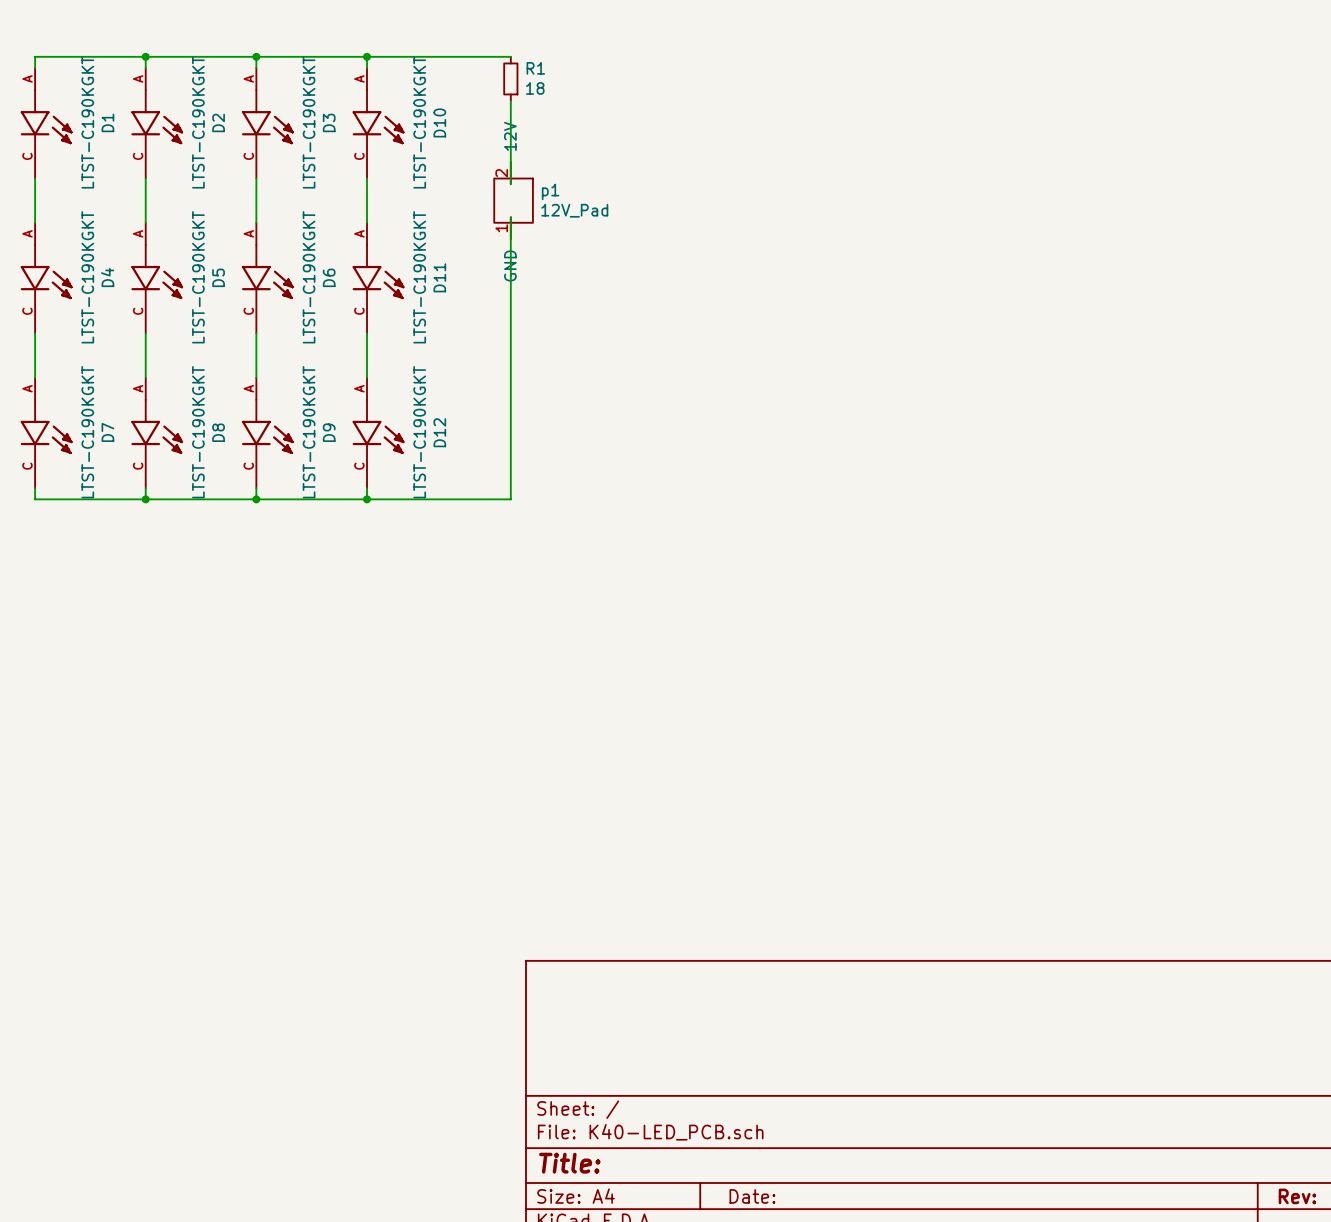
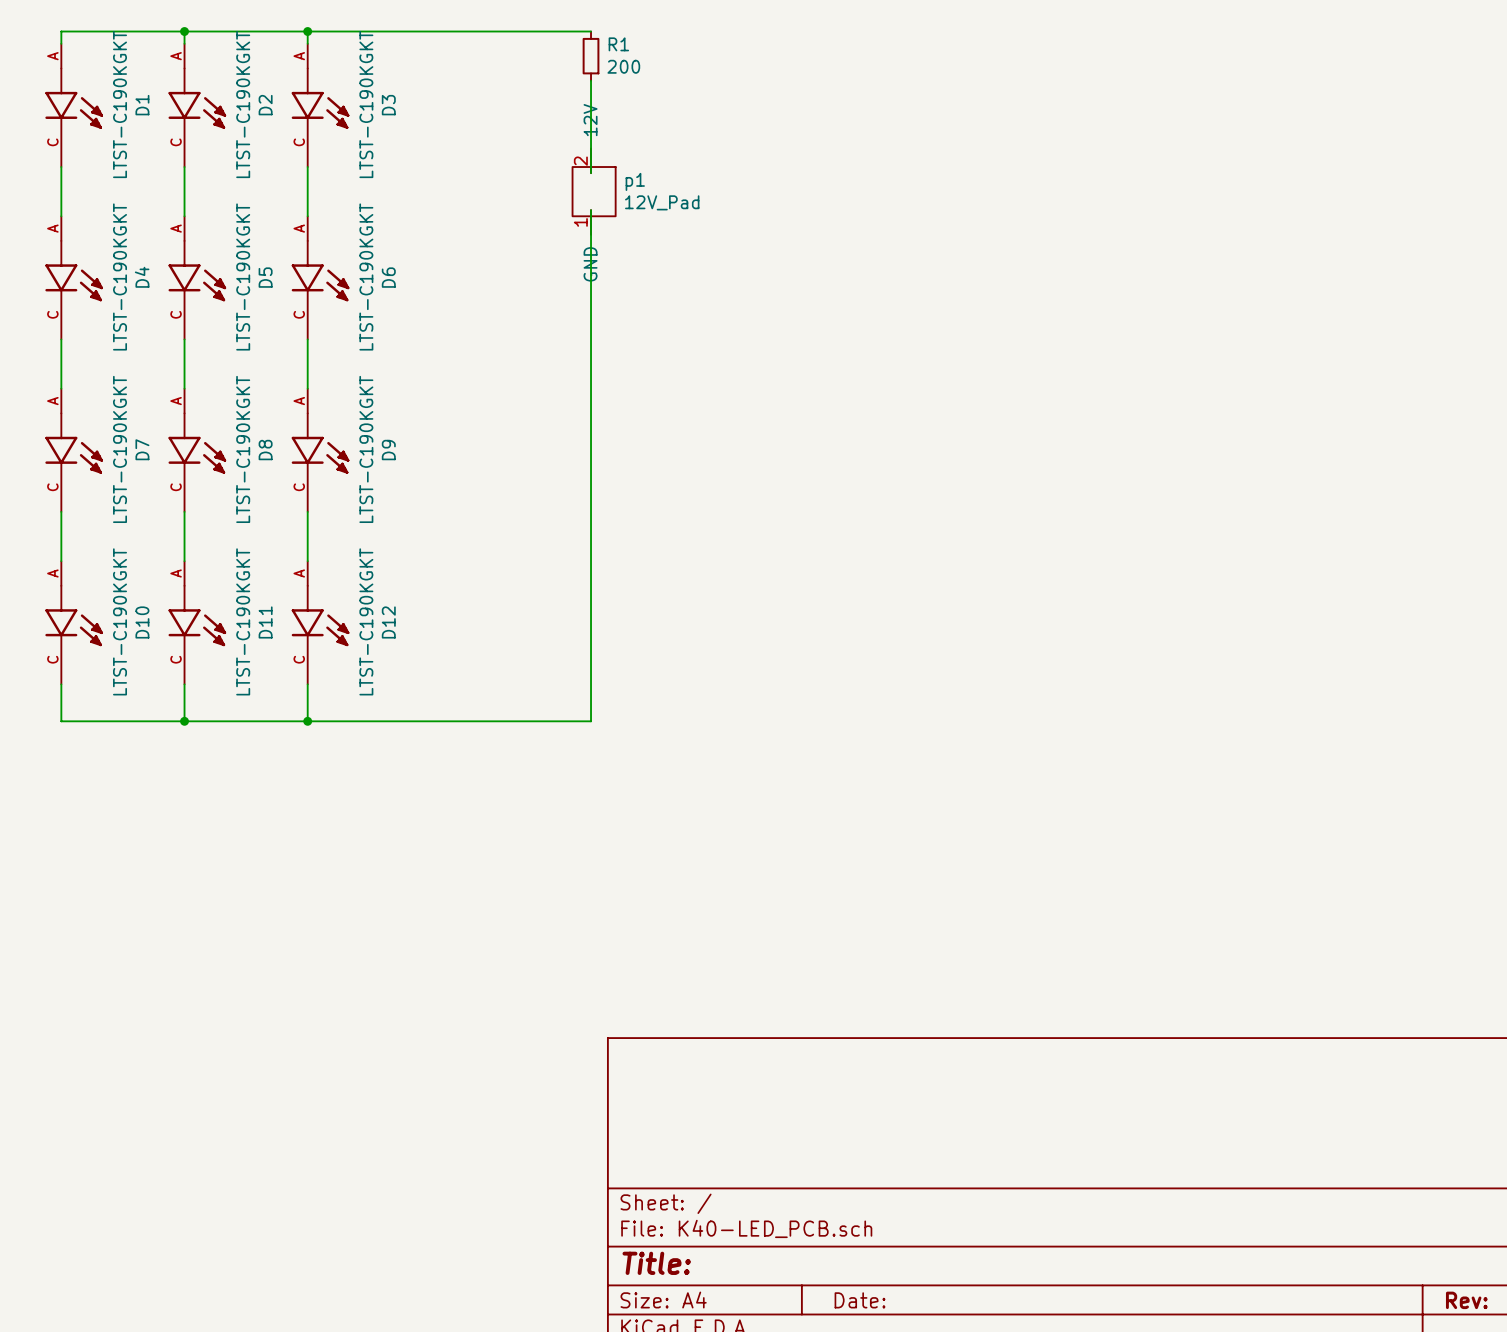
wire: (367, 56) (367, 67) -> none
junction: (367, 56) -> none
R1 value: 18 (535, 88) -> 200 (623, 66)
D10 position: (378, 123) -> (74, 622)
wire: (367, 178) (367, 222) -> none
D11 position: (378, 278) -> (197, 622)
wire: (367, 333) (367, 377) -> none
D12 position: (378, 432) -> (320, 622)
wire: (367, 488) (367, 499) -> none
wire: (35, 499) (510, 499) -> (61, 684) (61, 721) (591, 721) (591, 524)
wire: none -> (61, 524) (61, 561)
wire: none -> (184, 524) (184, 561)
junction: (145, 499) -> none
wire: none -> (307, 524) (307, 561)
junction: (256, 499) -> none
junction: (367, 499) -> none
wire: none -> (184, 684) (184, 721)
wire: none -> (307, 684) (307, 721)
junction: none -> (184, 721)
junction: none -> (307, 721)

